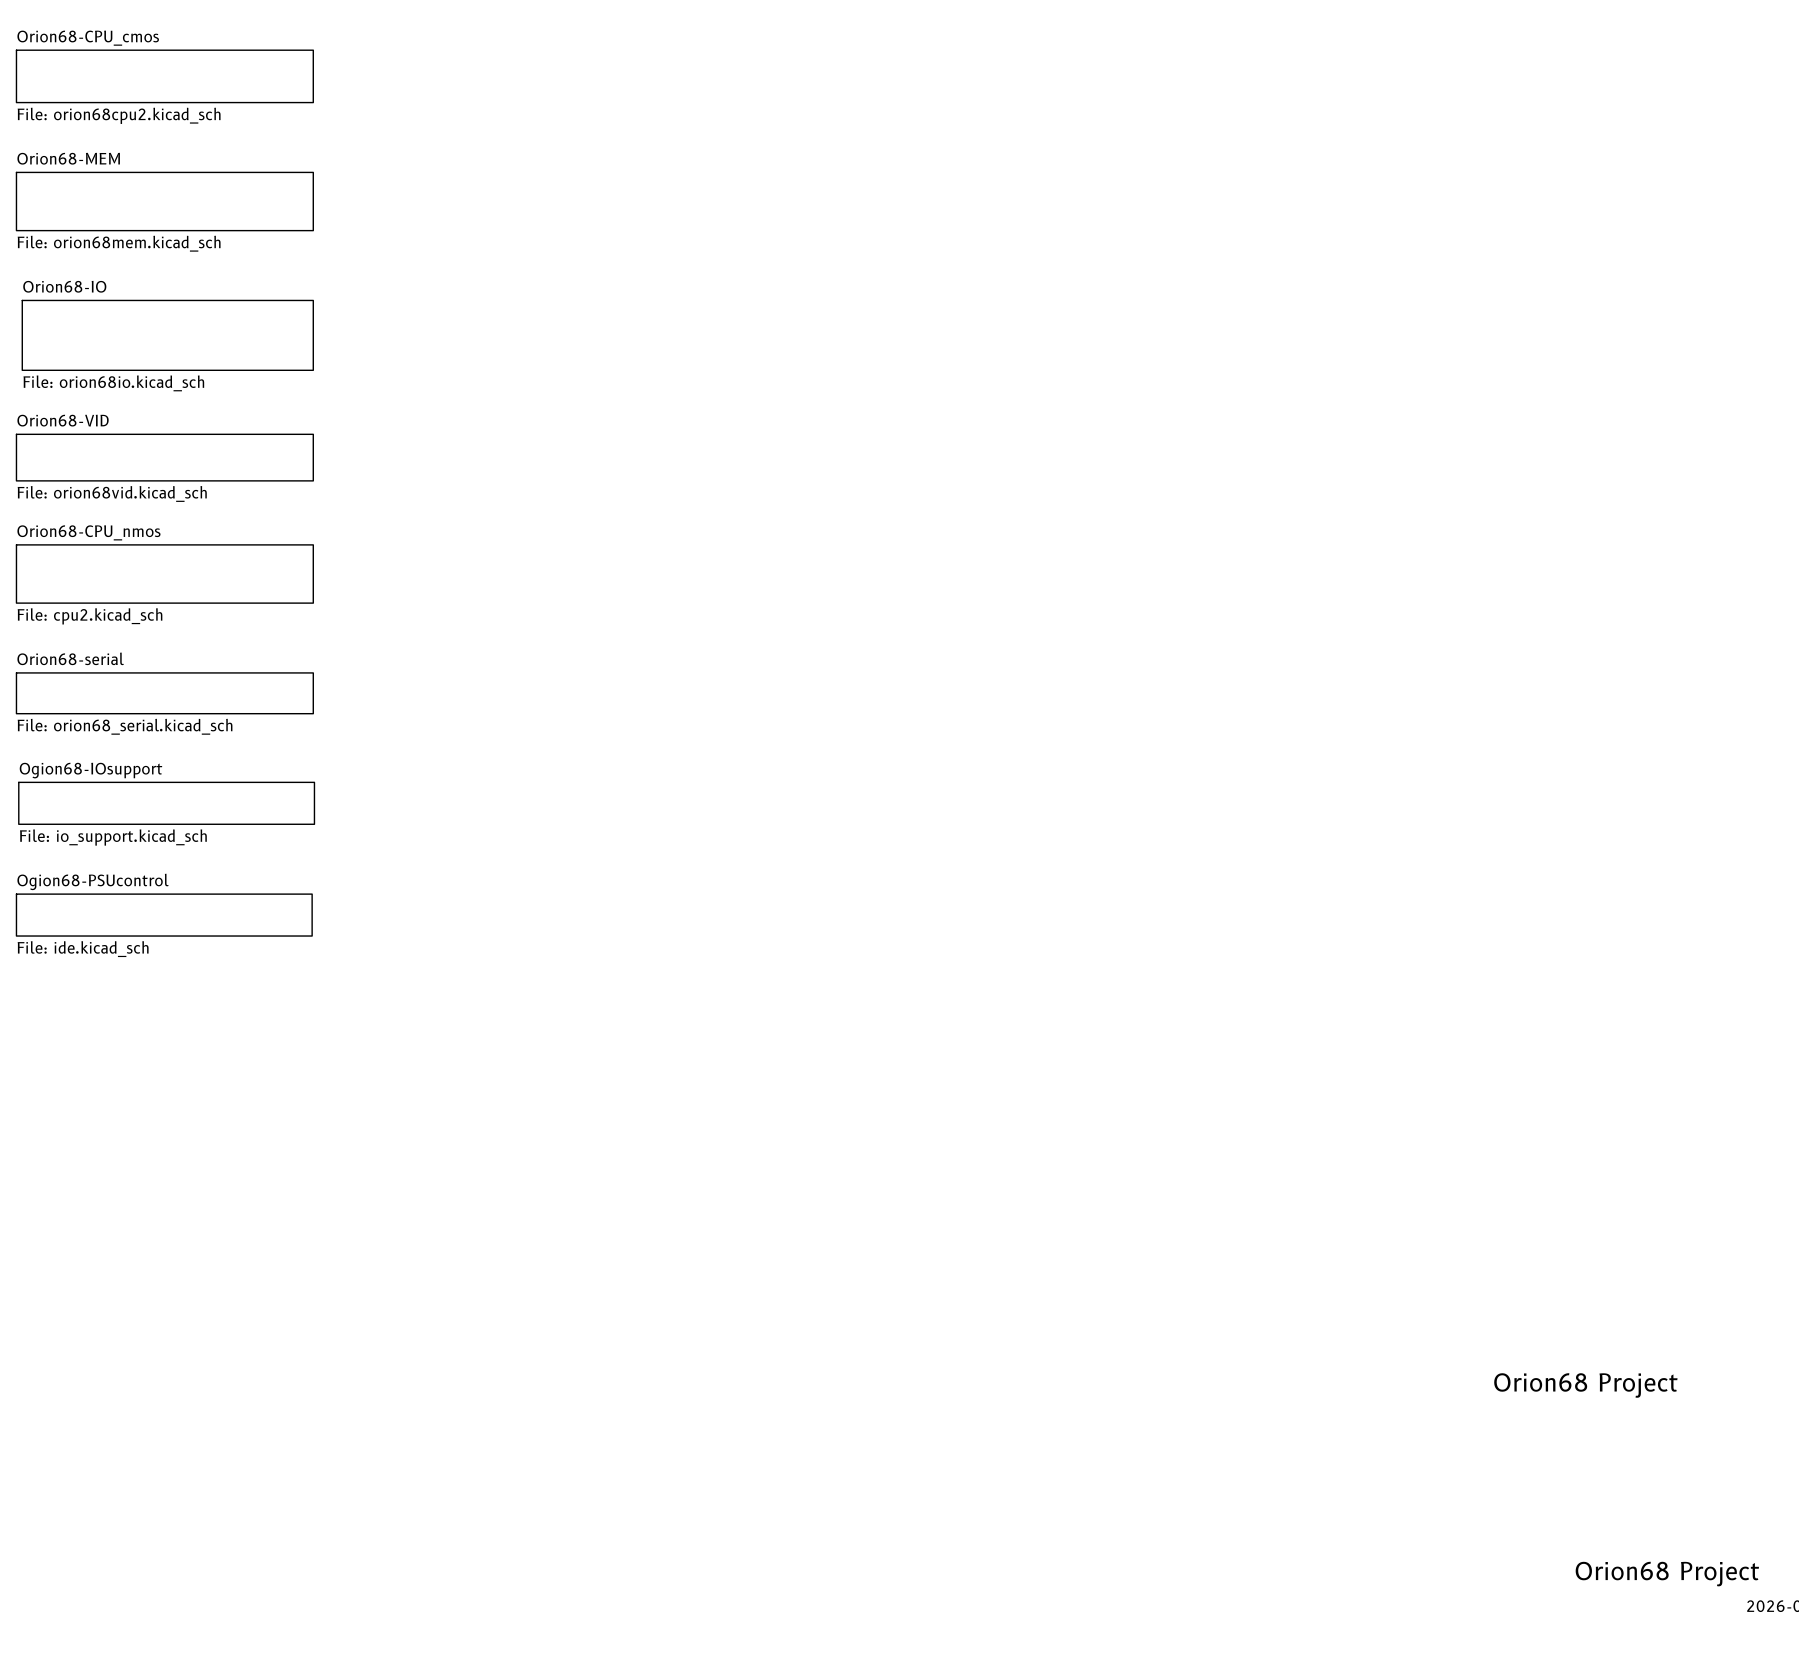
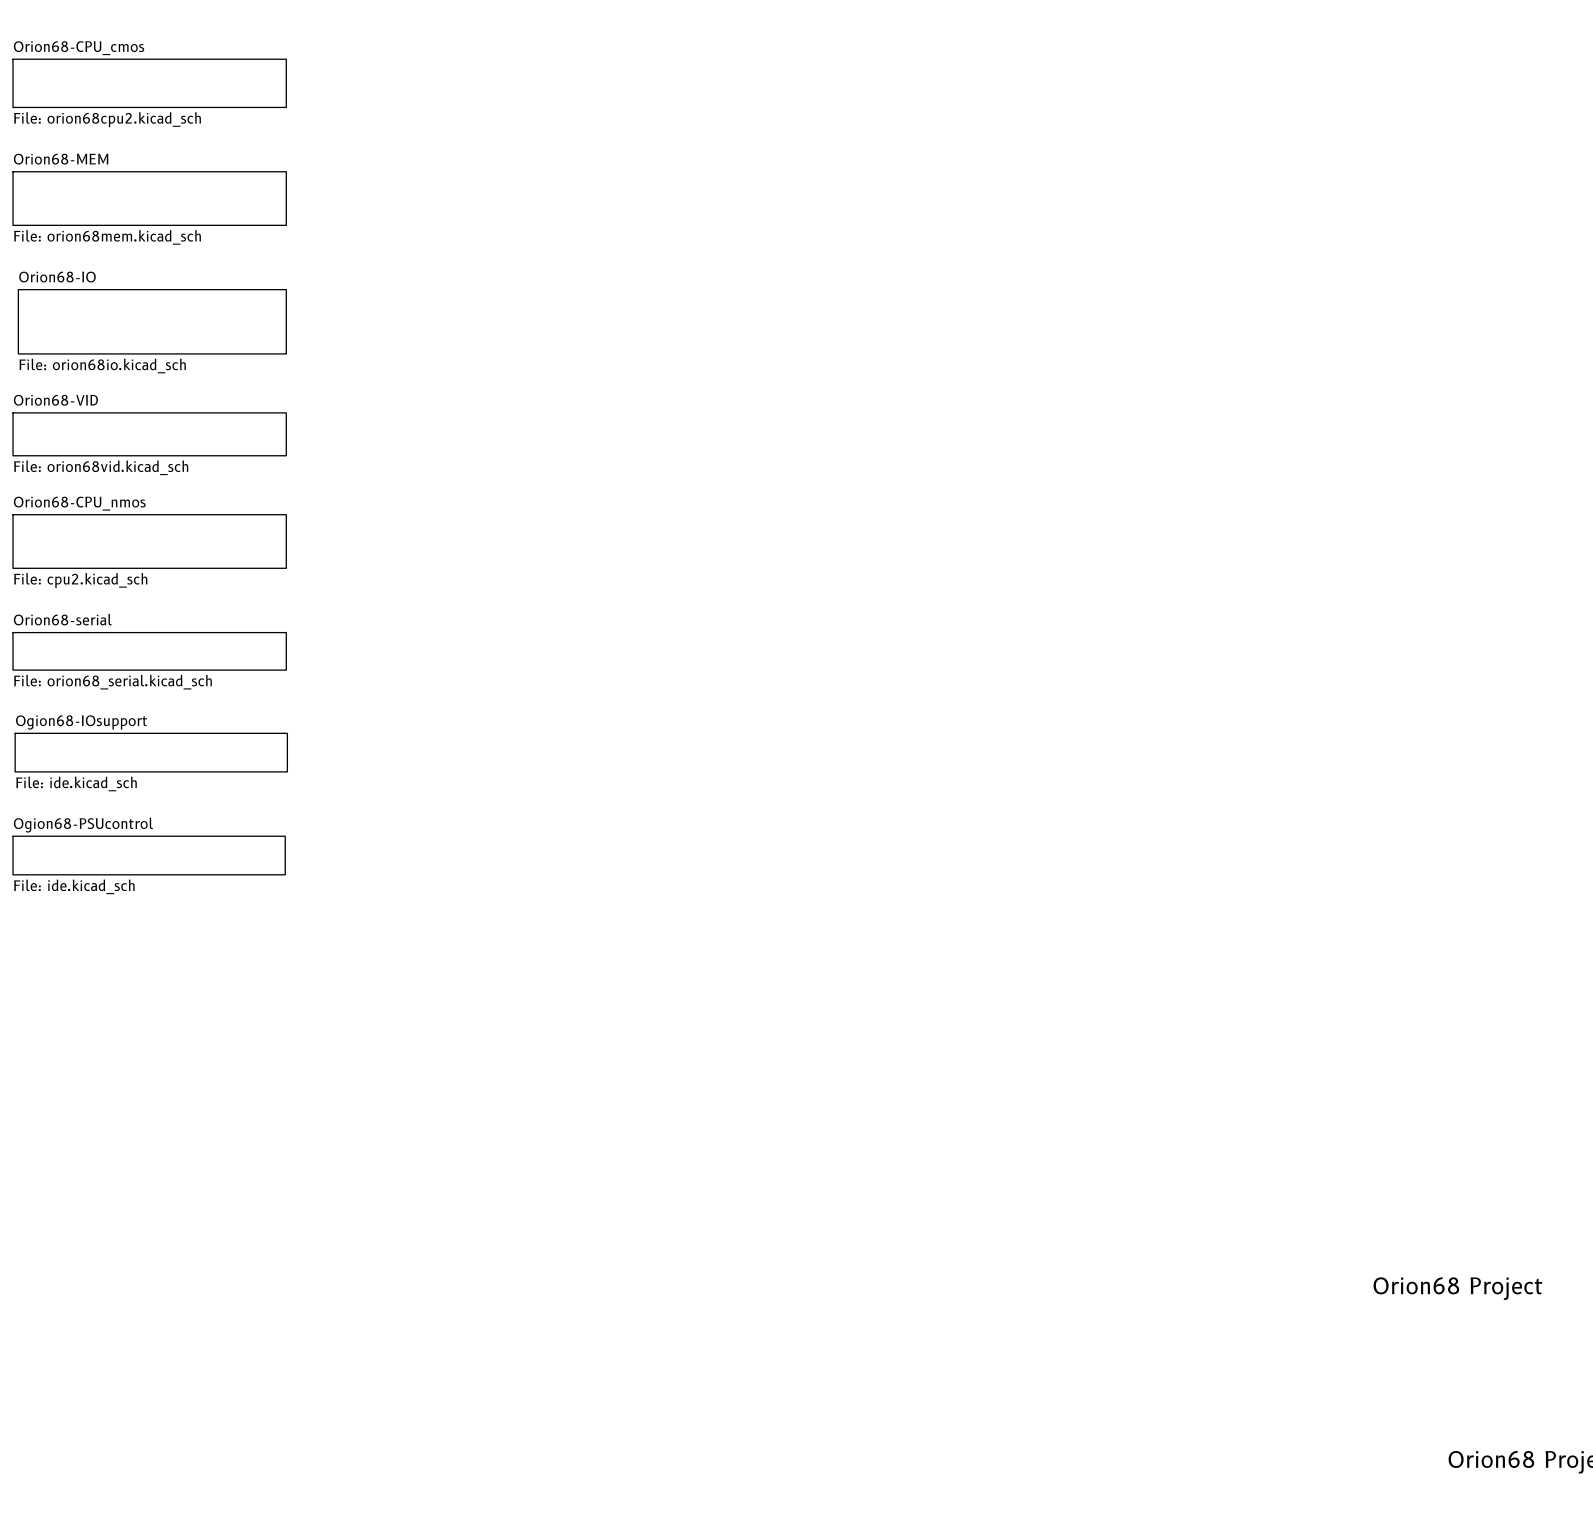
sheet Ogion68-IOsupport value: File: io_support.kicad_sch (113, 837) -> File: ide.kicad_sch (76, 783)

